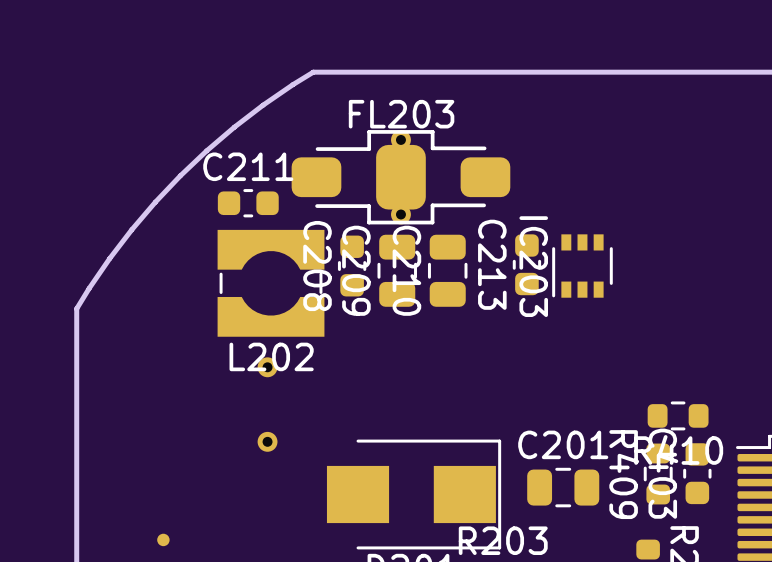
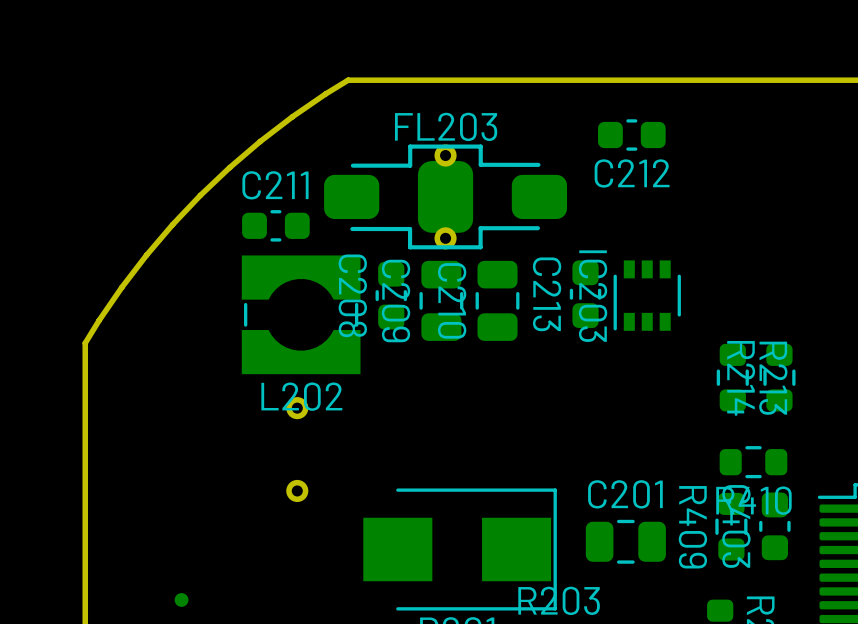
C212: none -> (631, 135)
R213: none -> (732, 377)
R214: none -> (779, 377)

